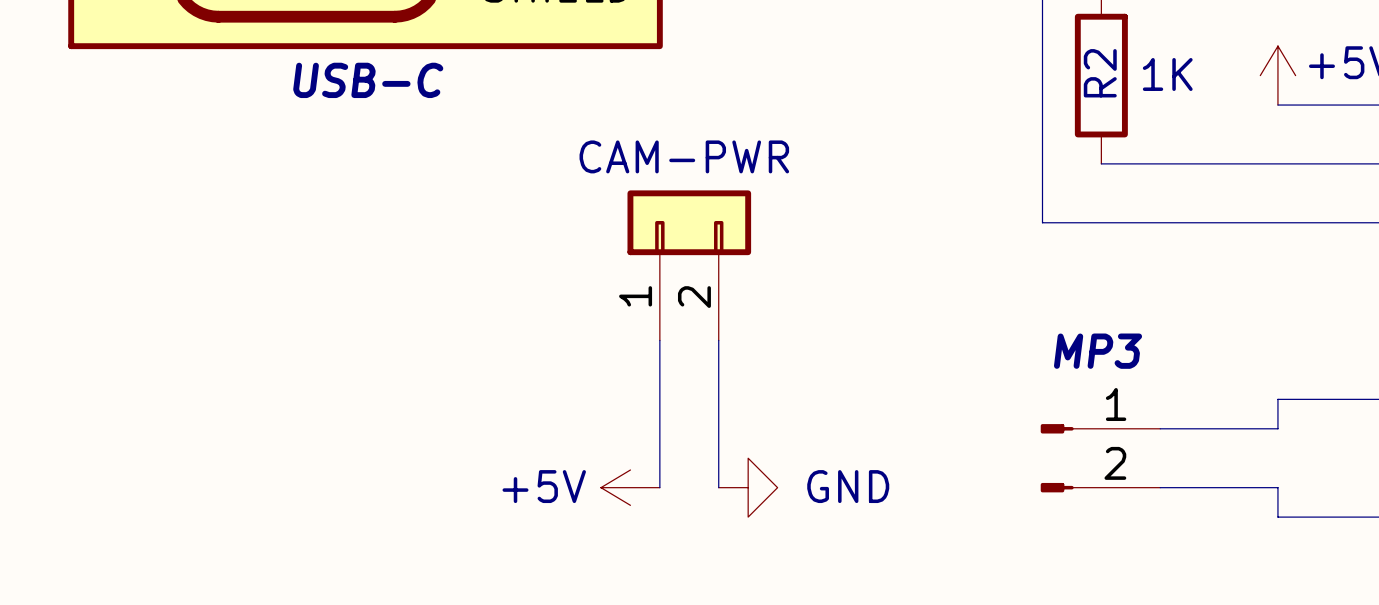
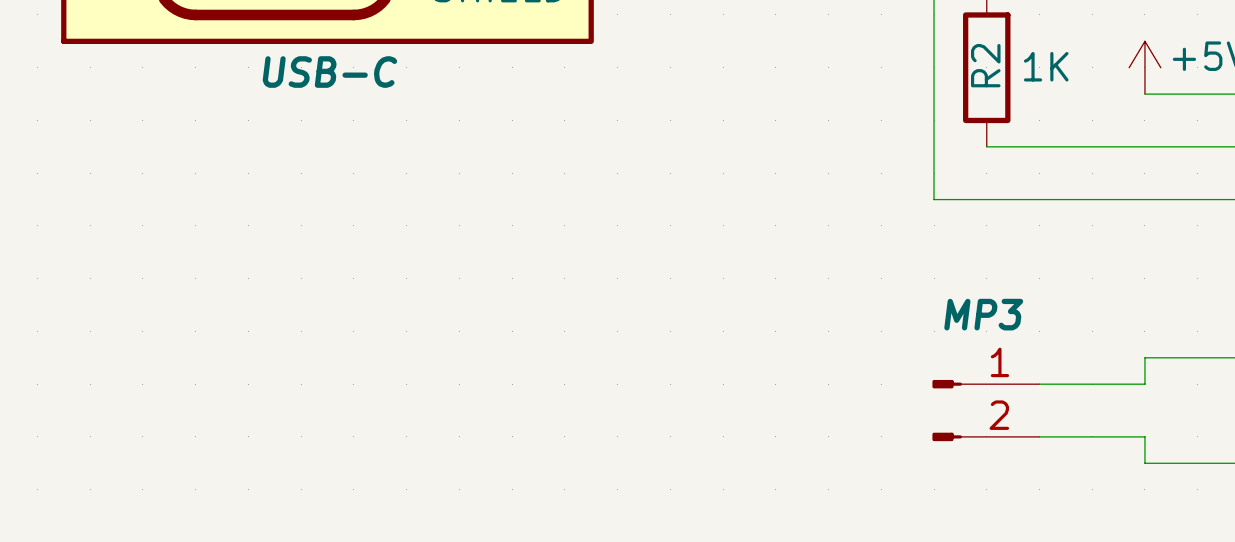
part: CAM-PWR (689, 265) -> none
wire: (659, 340) (659, 487) -> none
wire: (718, 340) (718, 487) -> none
power symbol: +5V (630, 487) -> none
power symbol: GND (748, 487) -> none

